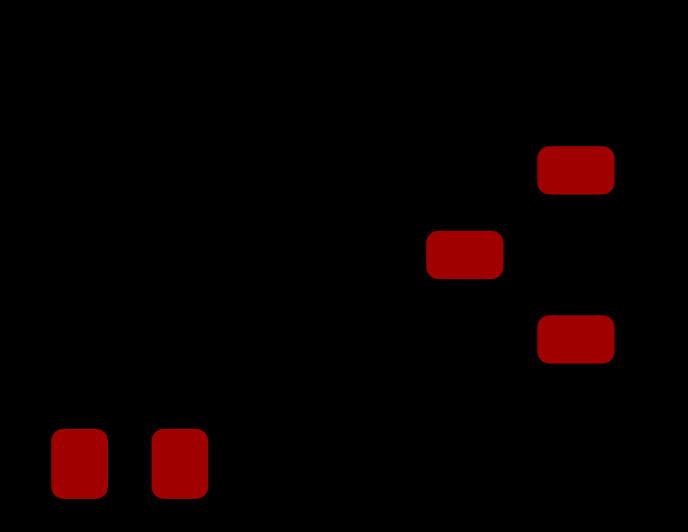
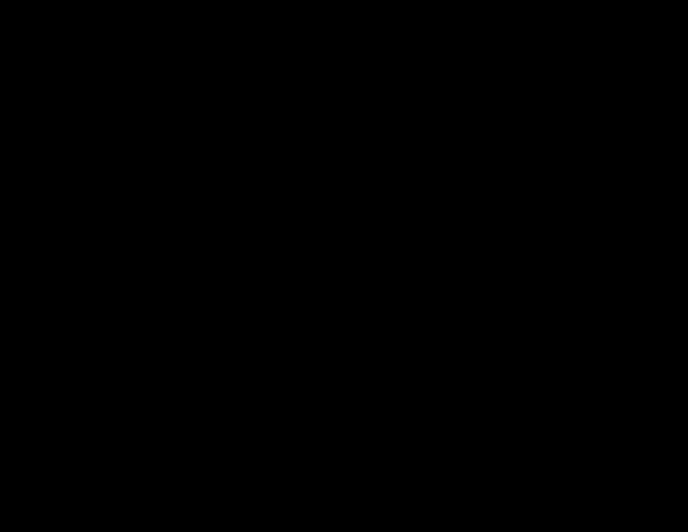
part: (520, 254) -> none
part: (129, 463) -> none

